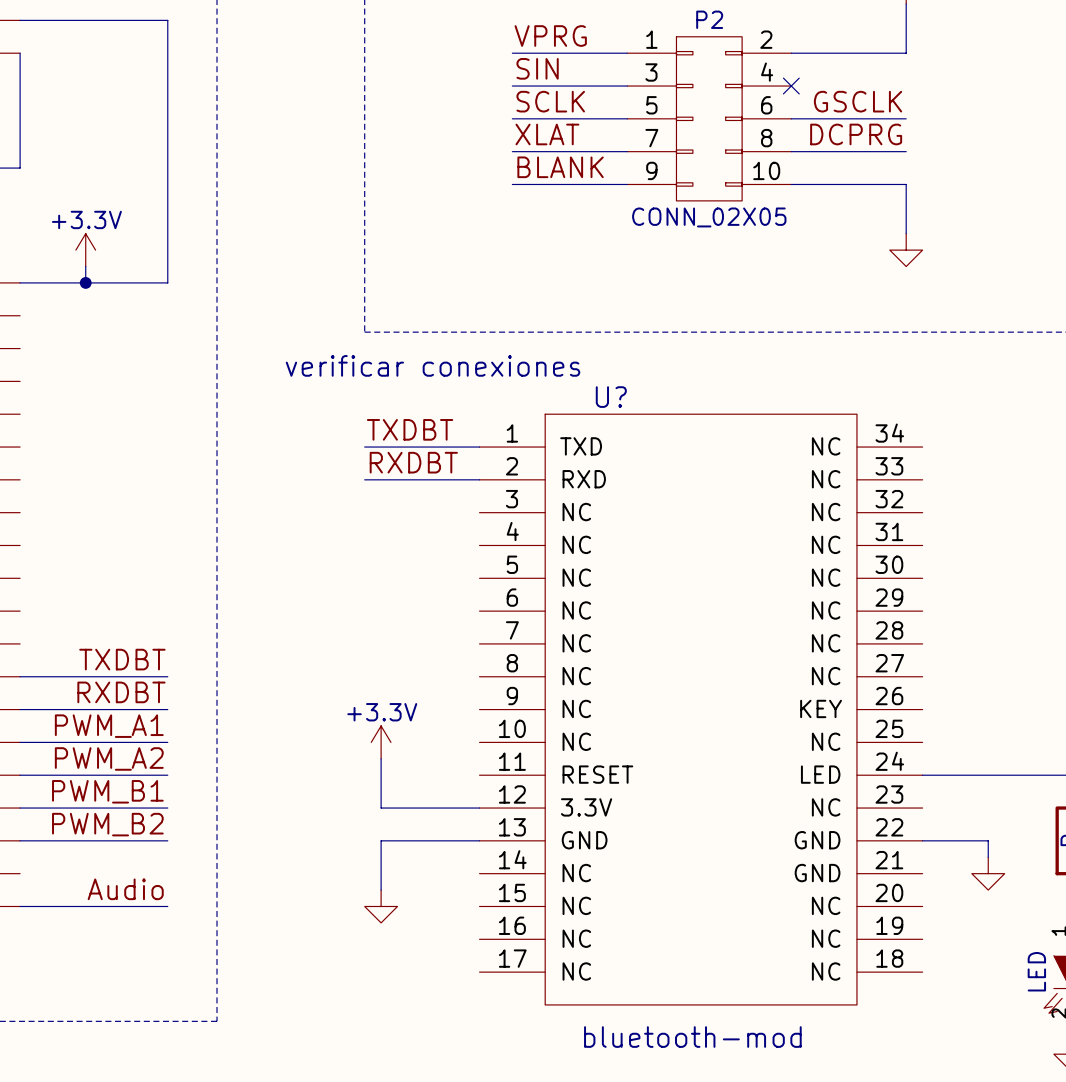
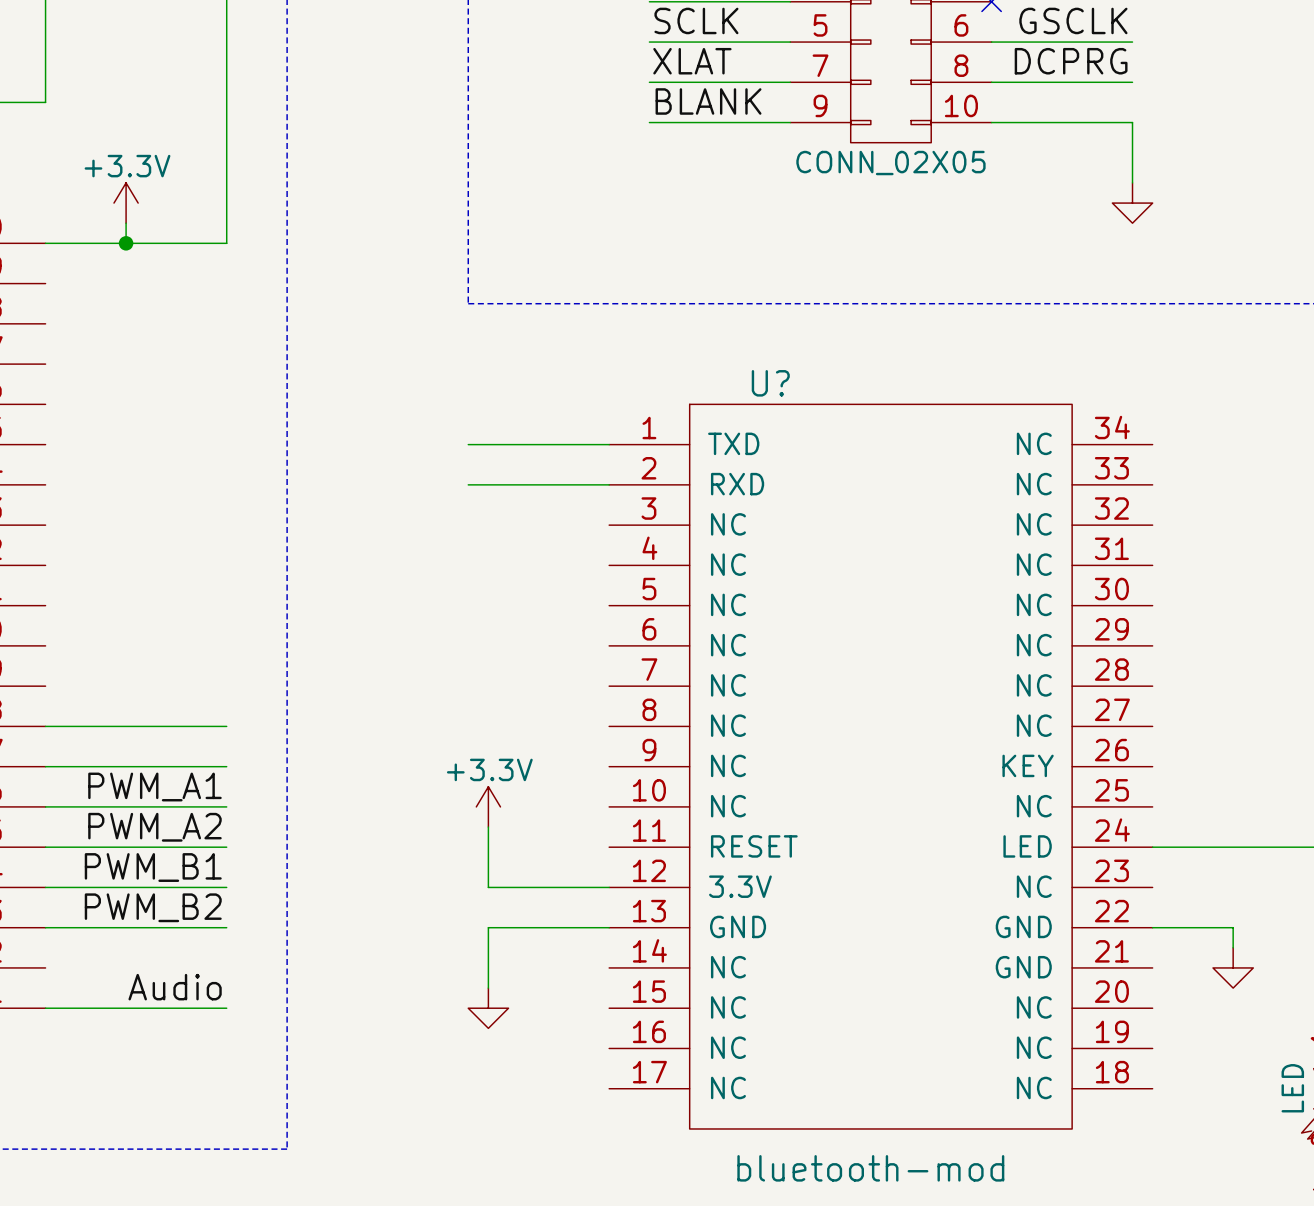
text: verificar conexiones (433, 365) -> none
label: TXDBT (410, 429) -> none
label: RXDBT (413, 462) -> none
label: TXDBT (122, 659) -> none
label: RXDBT (121, 692) -> none

